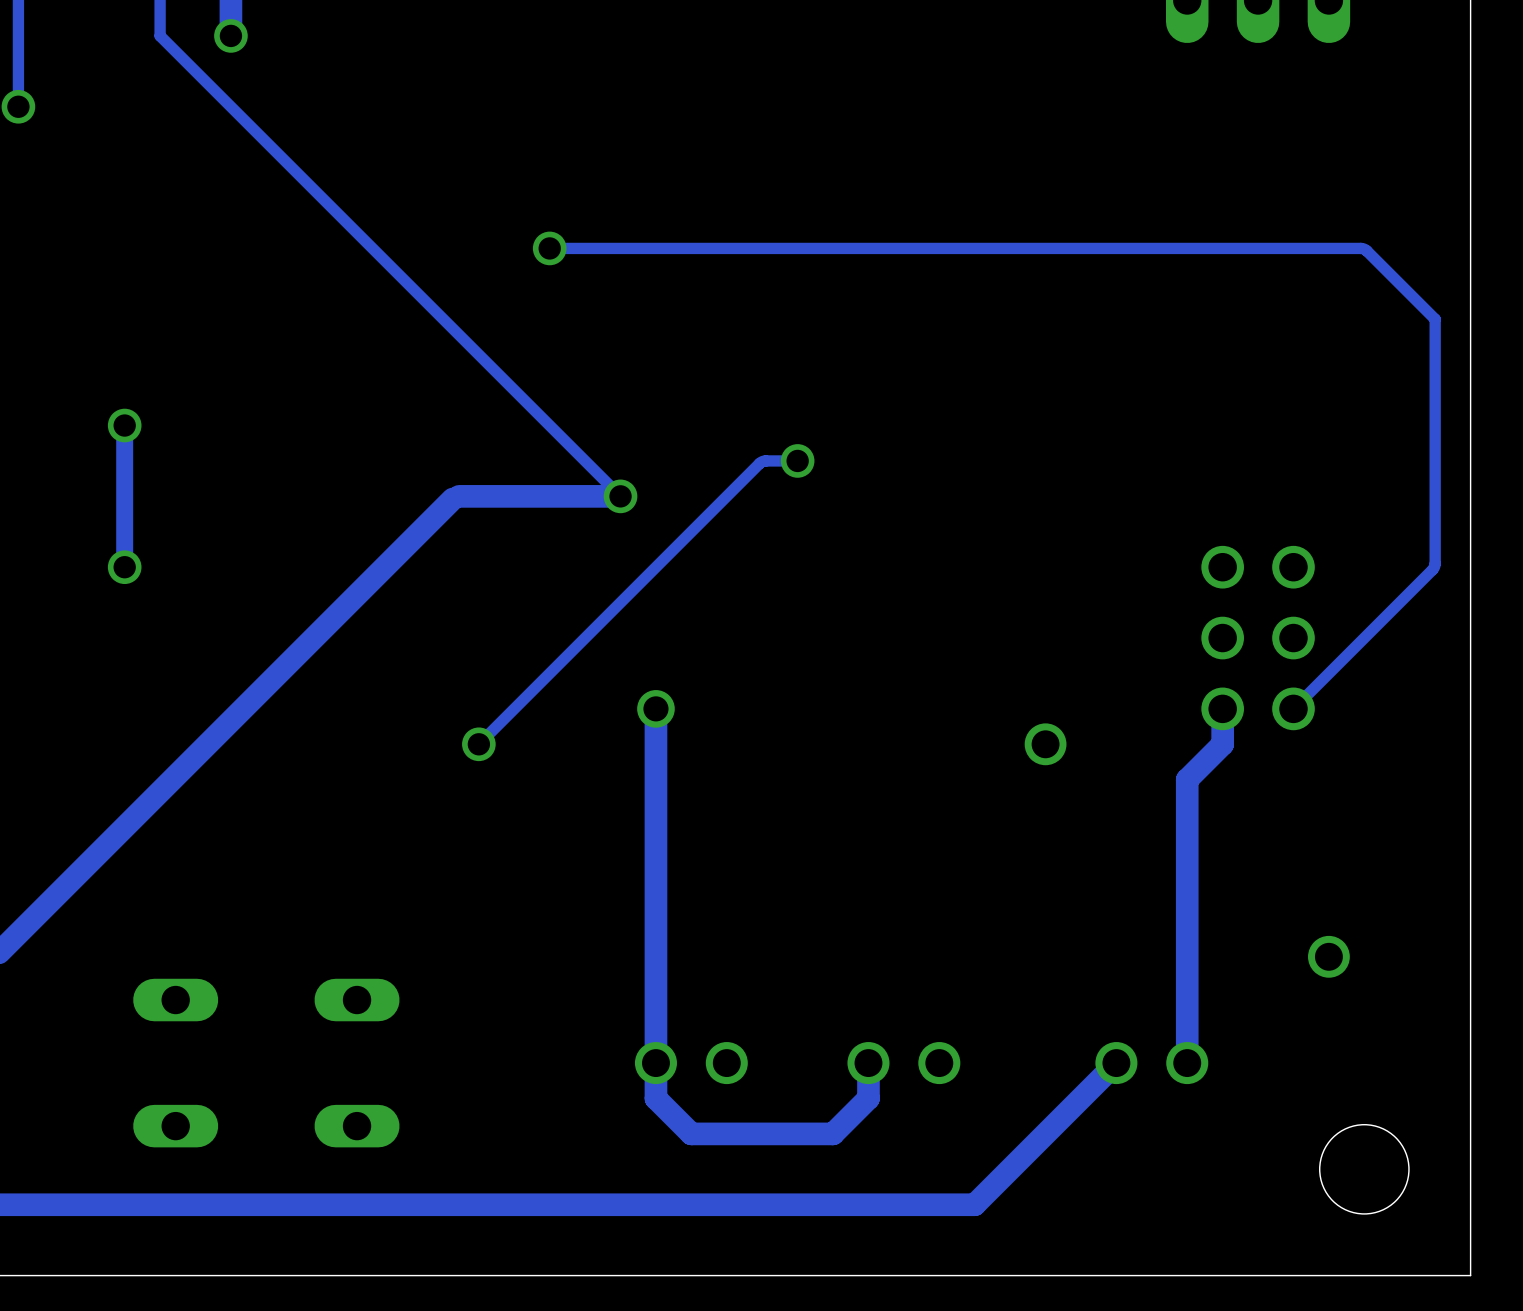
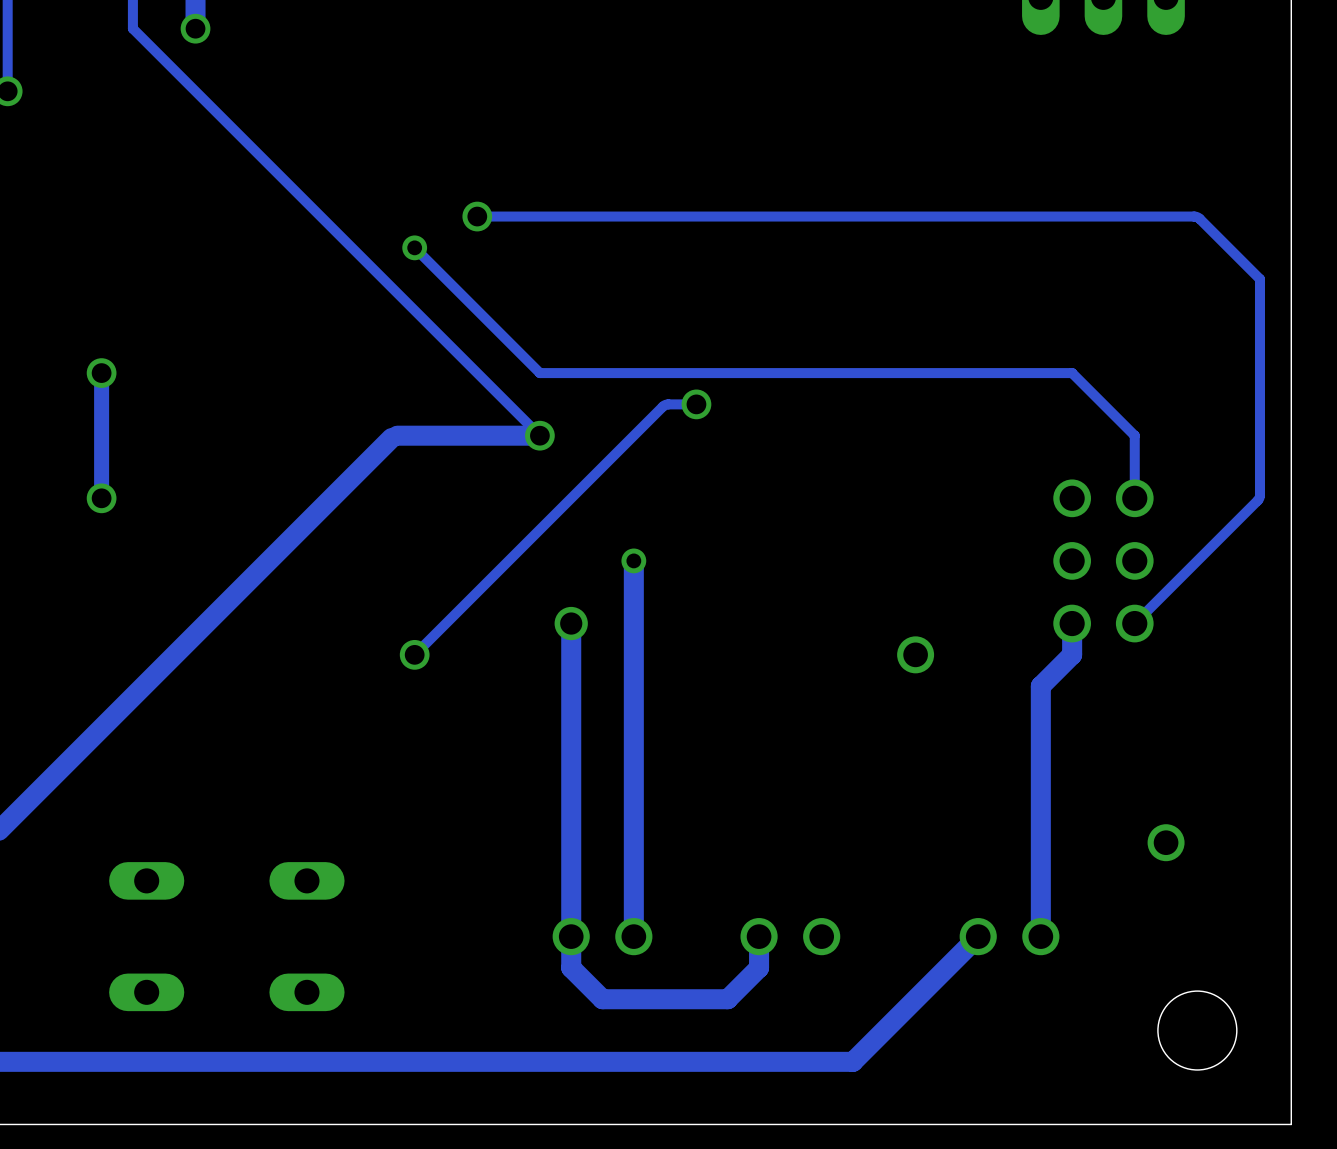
track: none -> (414, 247) (539, 373) (1072, 373) (1134, 435) (1134, 498)
via: none -> (414, 247)
track: none -> (633, 560) (633, 936)
via: none -> (633, 560)

